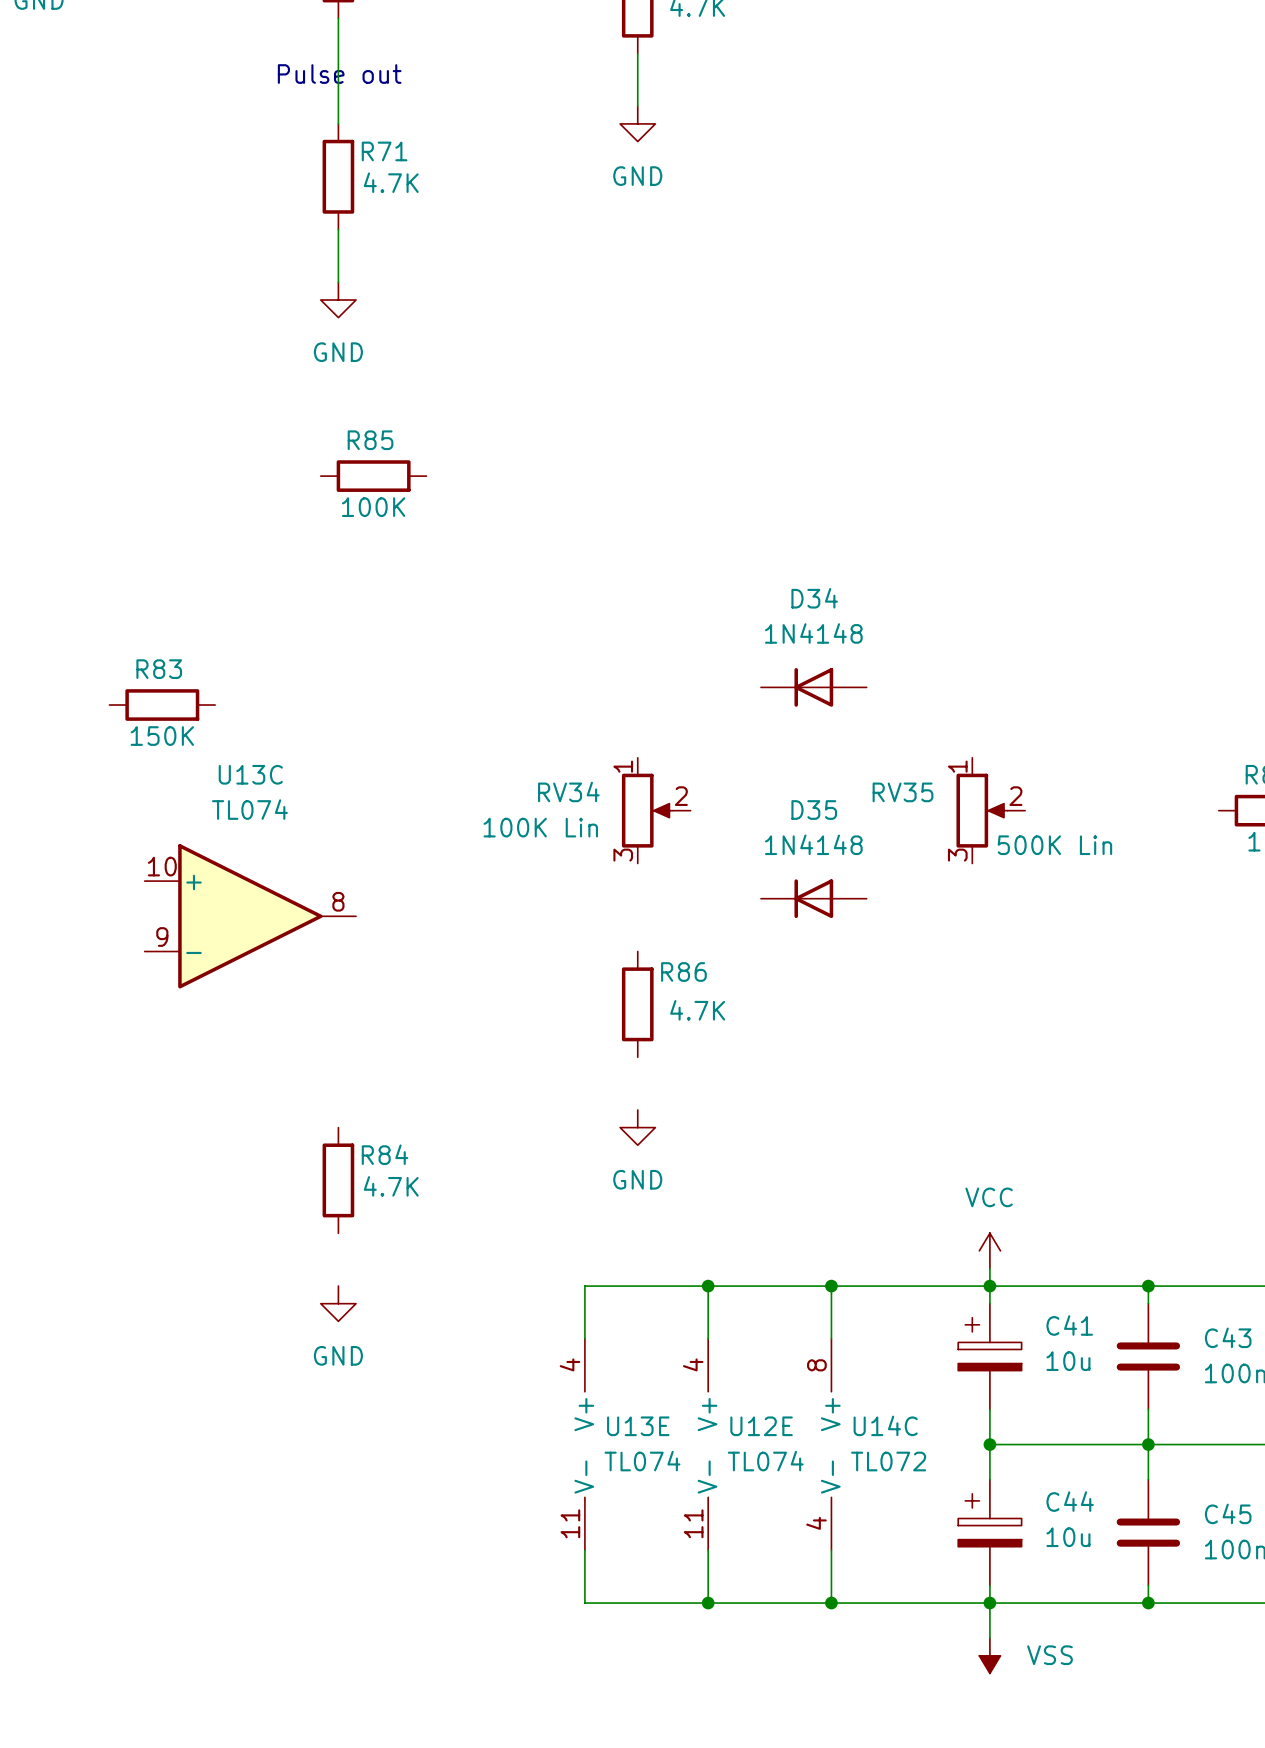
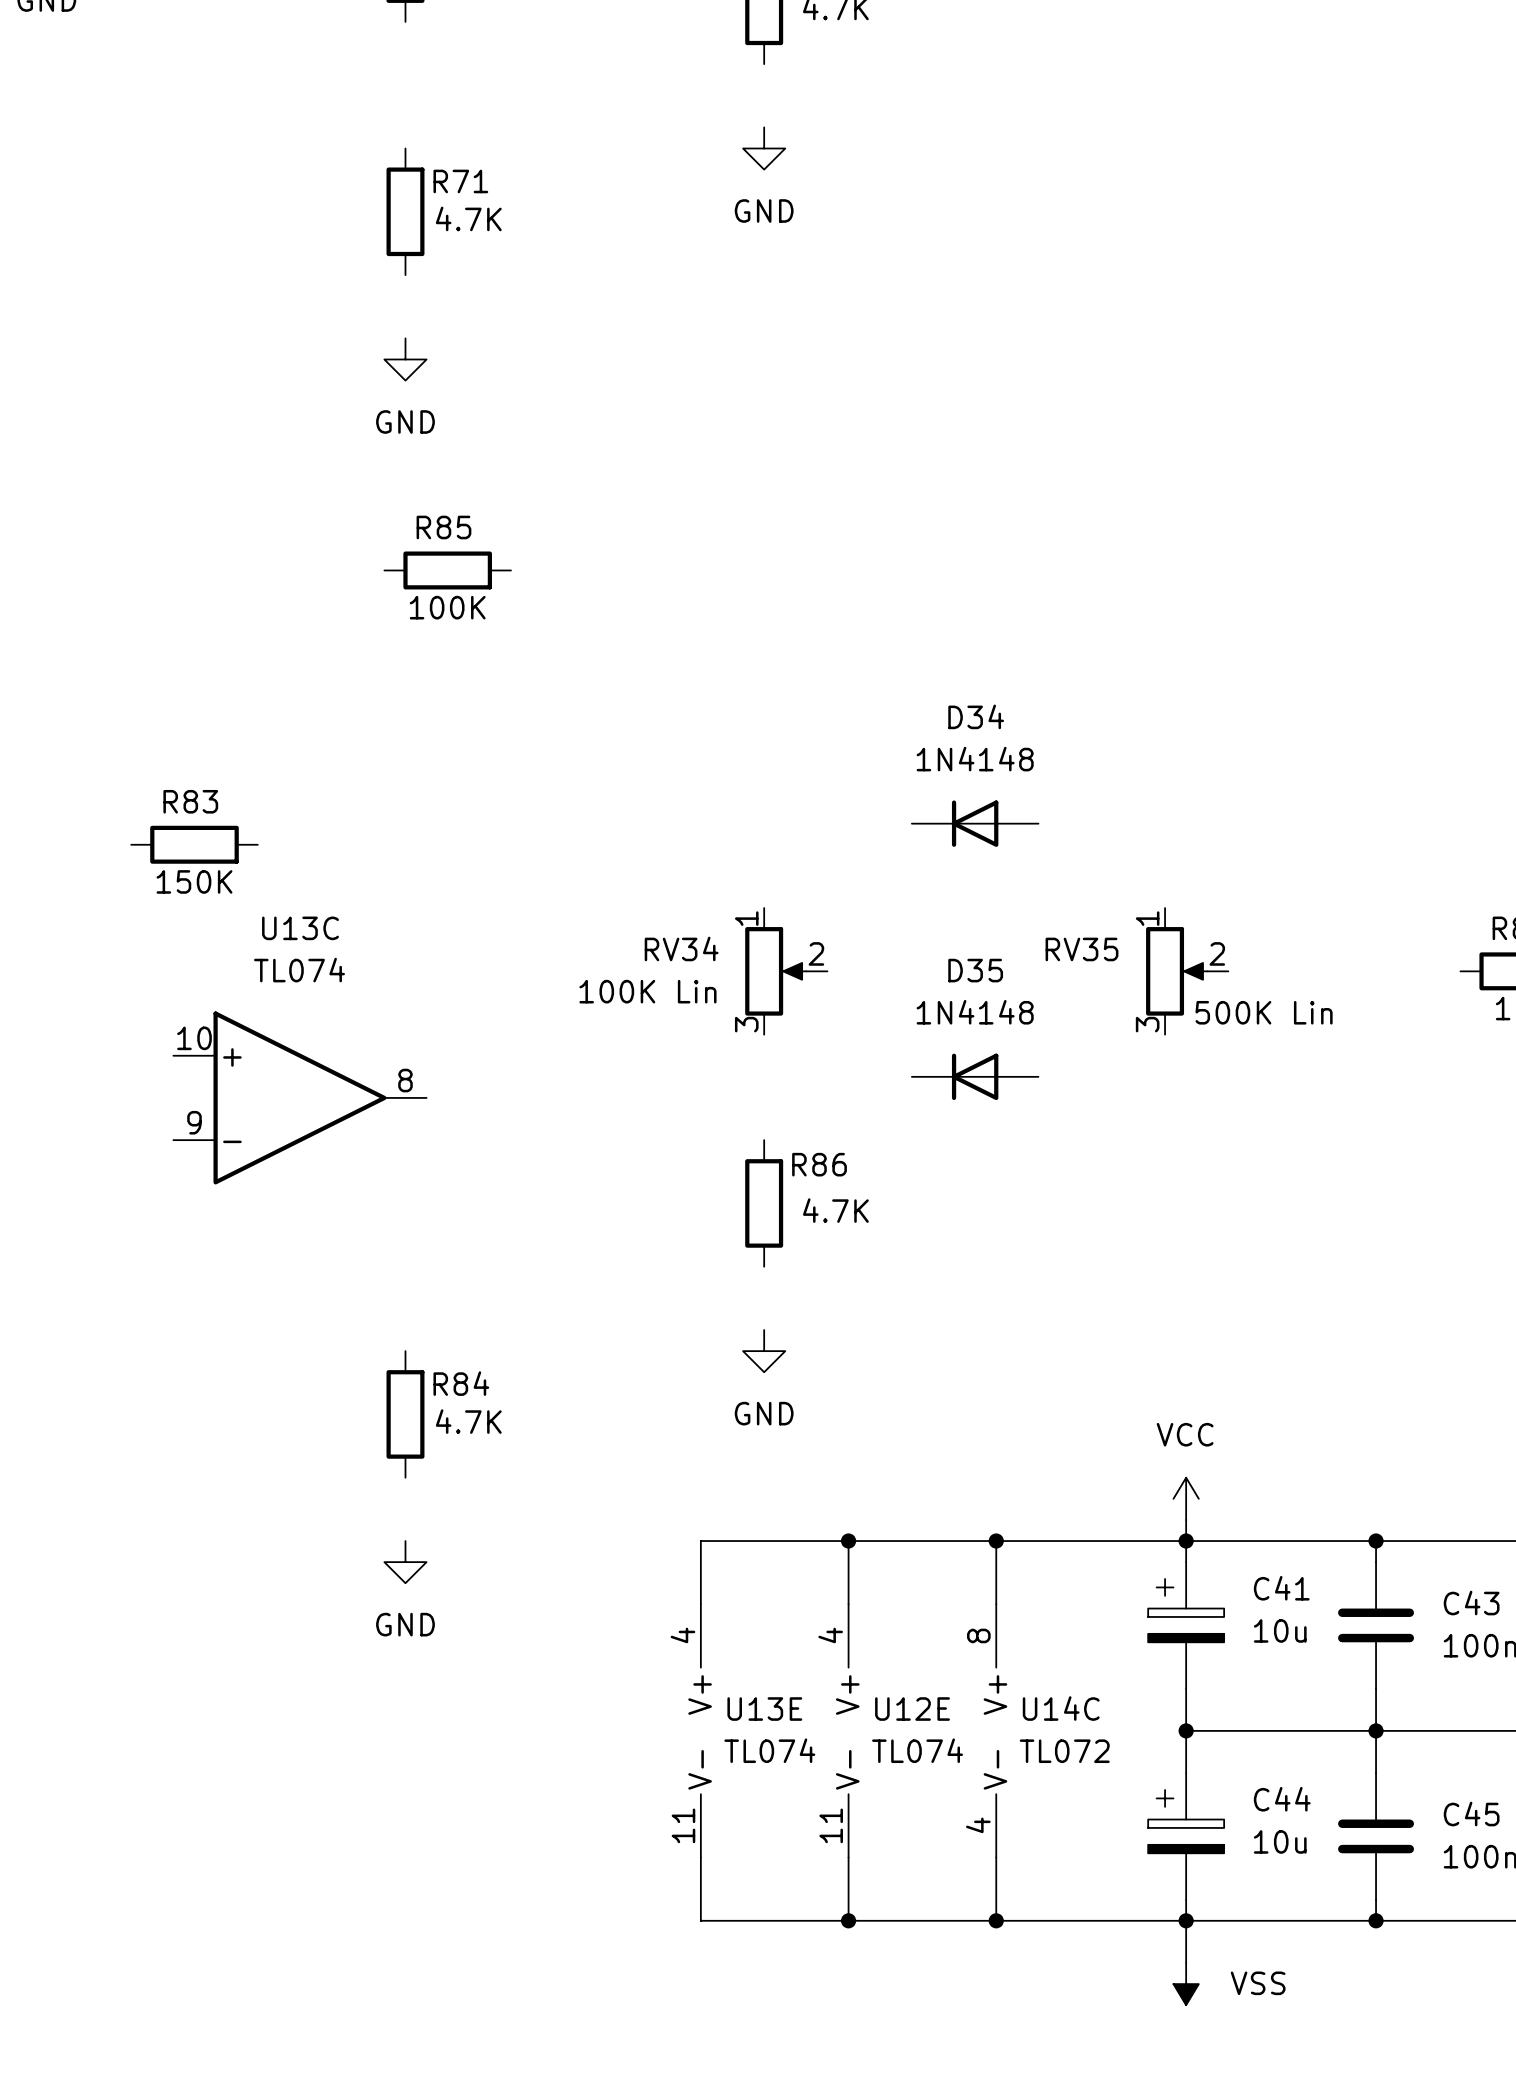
wire: (338, 18) (338, 123) -> none
wire: (637, 53) (637, 106) -> none
text: Pulse out (339, 74) -> none
wire: (338, 229) (338, 282) -> none

